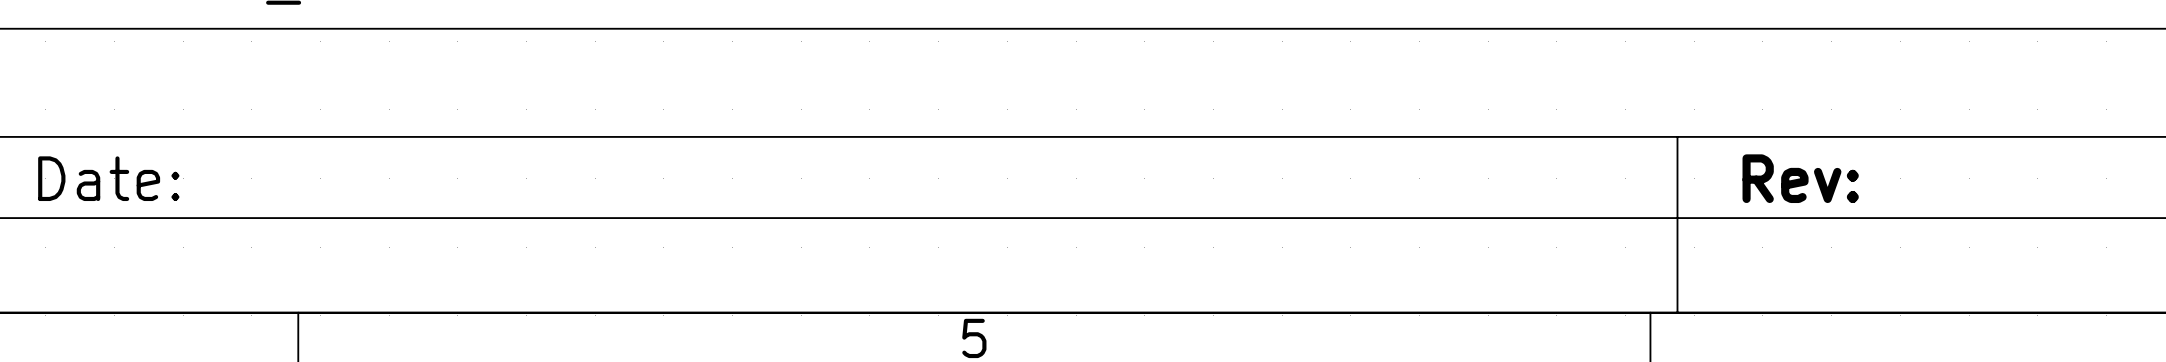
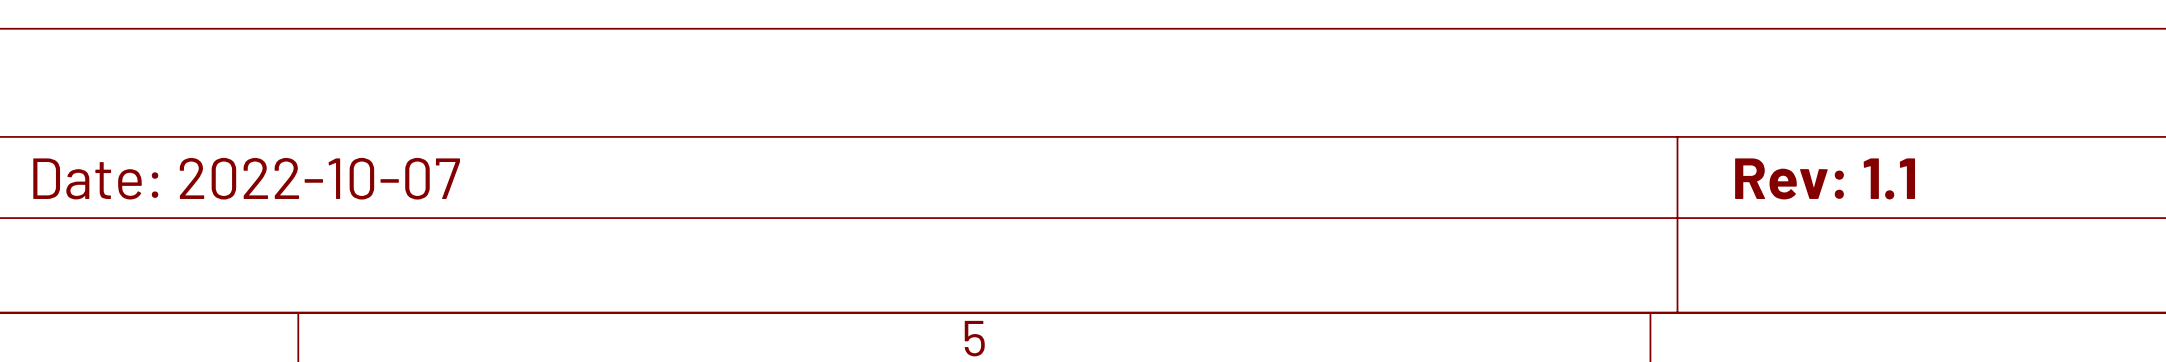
title block: Date: (108, 178) -> Date: 2022-10-07 (246, 178)
title block: Rev: (1800, 178) -> Rev: 1.1 (1825, 178)

